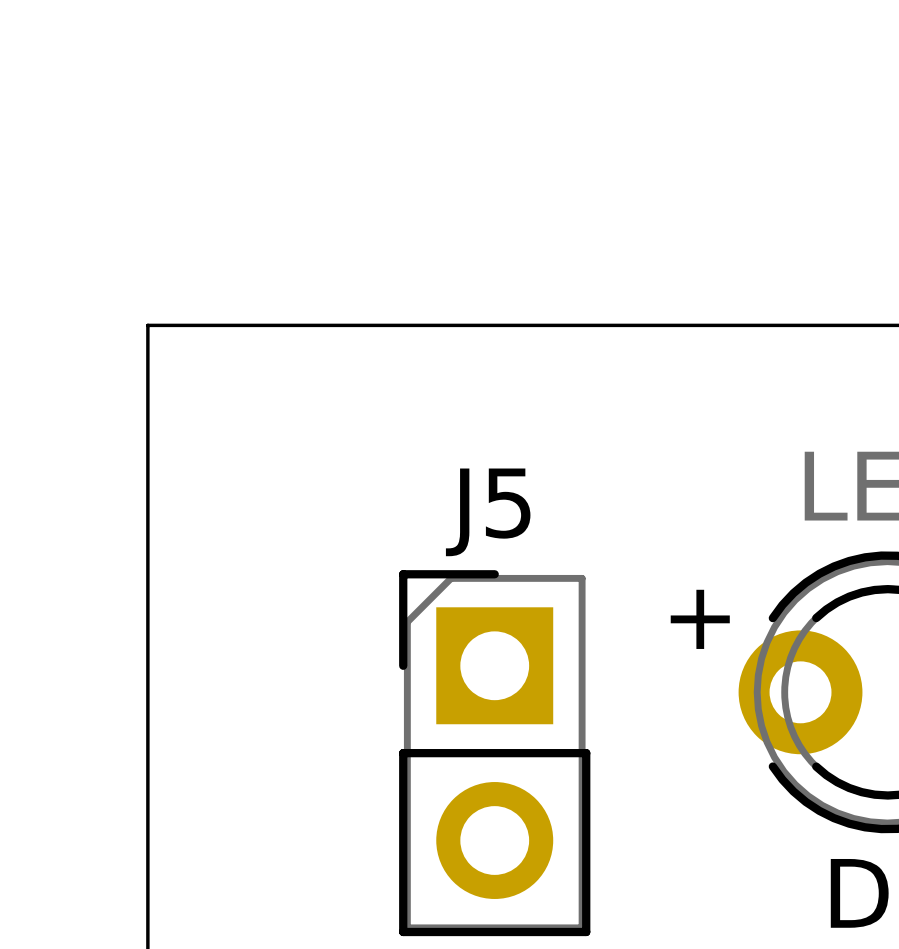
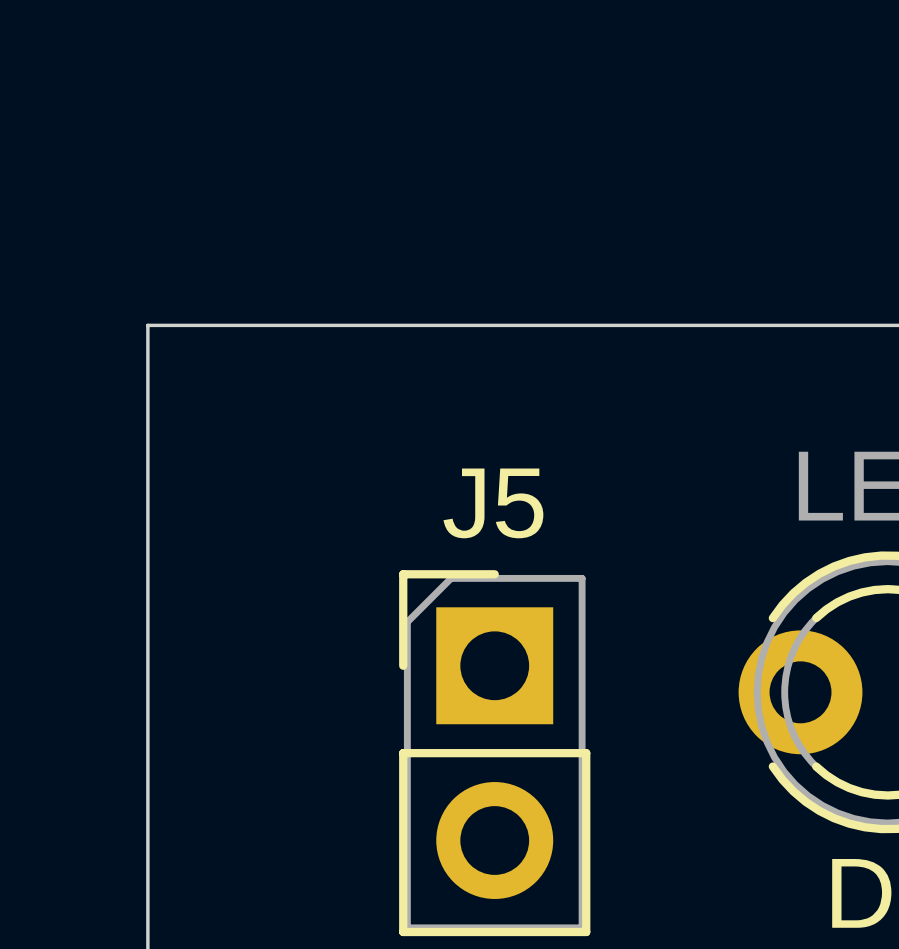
text: + (700, 619) -> none

